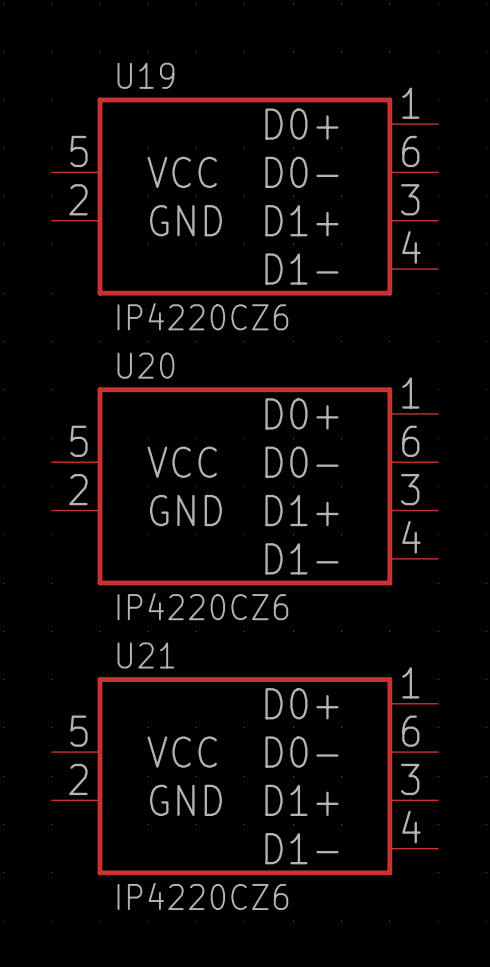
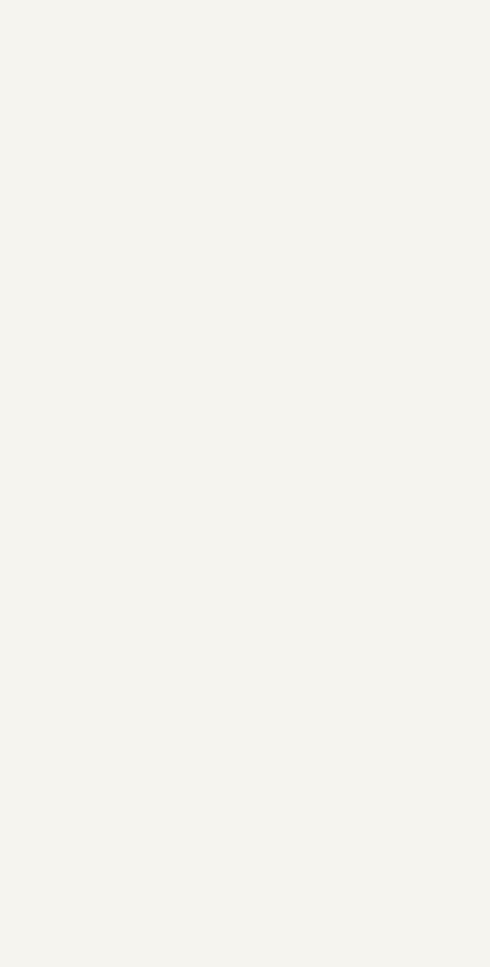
U19: IP4220CZ6 (244, 196) -> none
U20: IP4220CZ6 (244, 486) -> none
U21: IP4220CZ6 (244, 776) -> none

